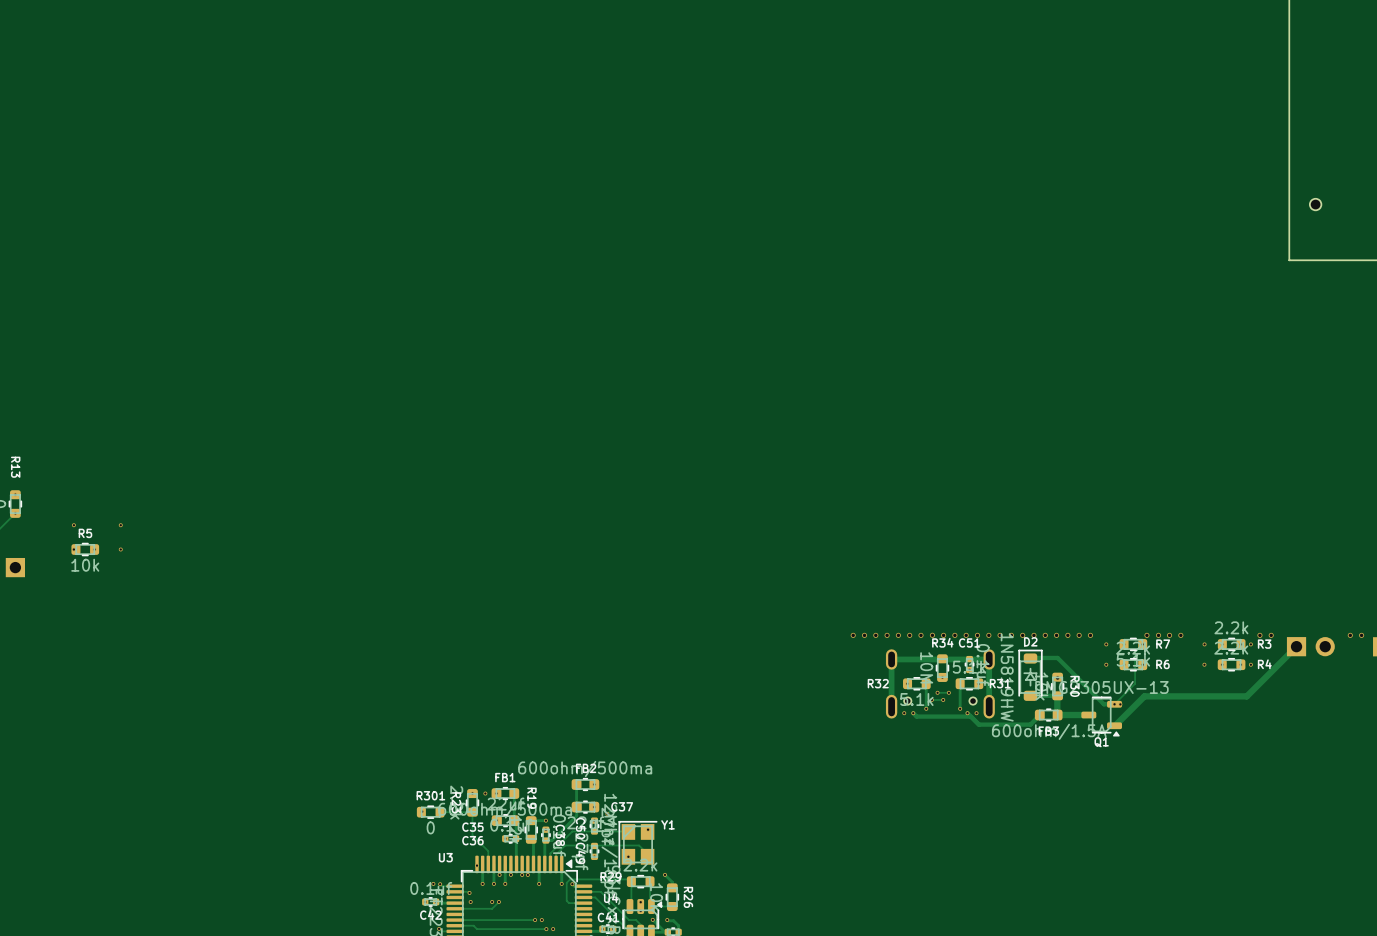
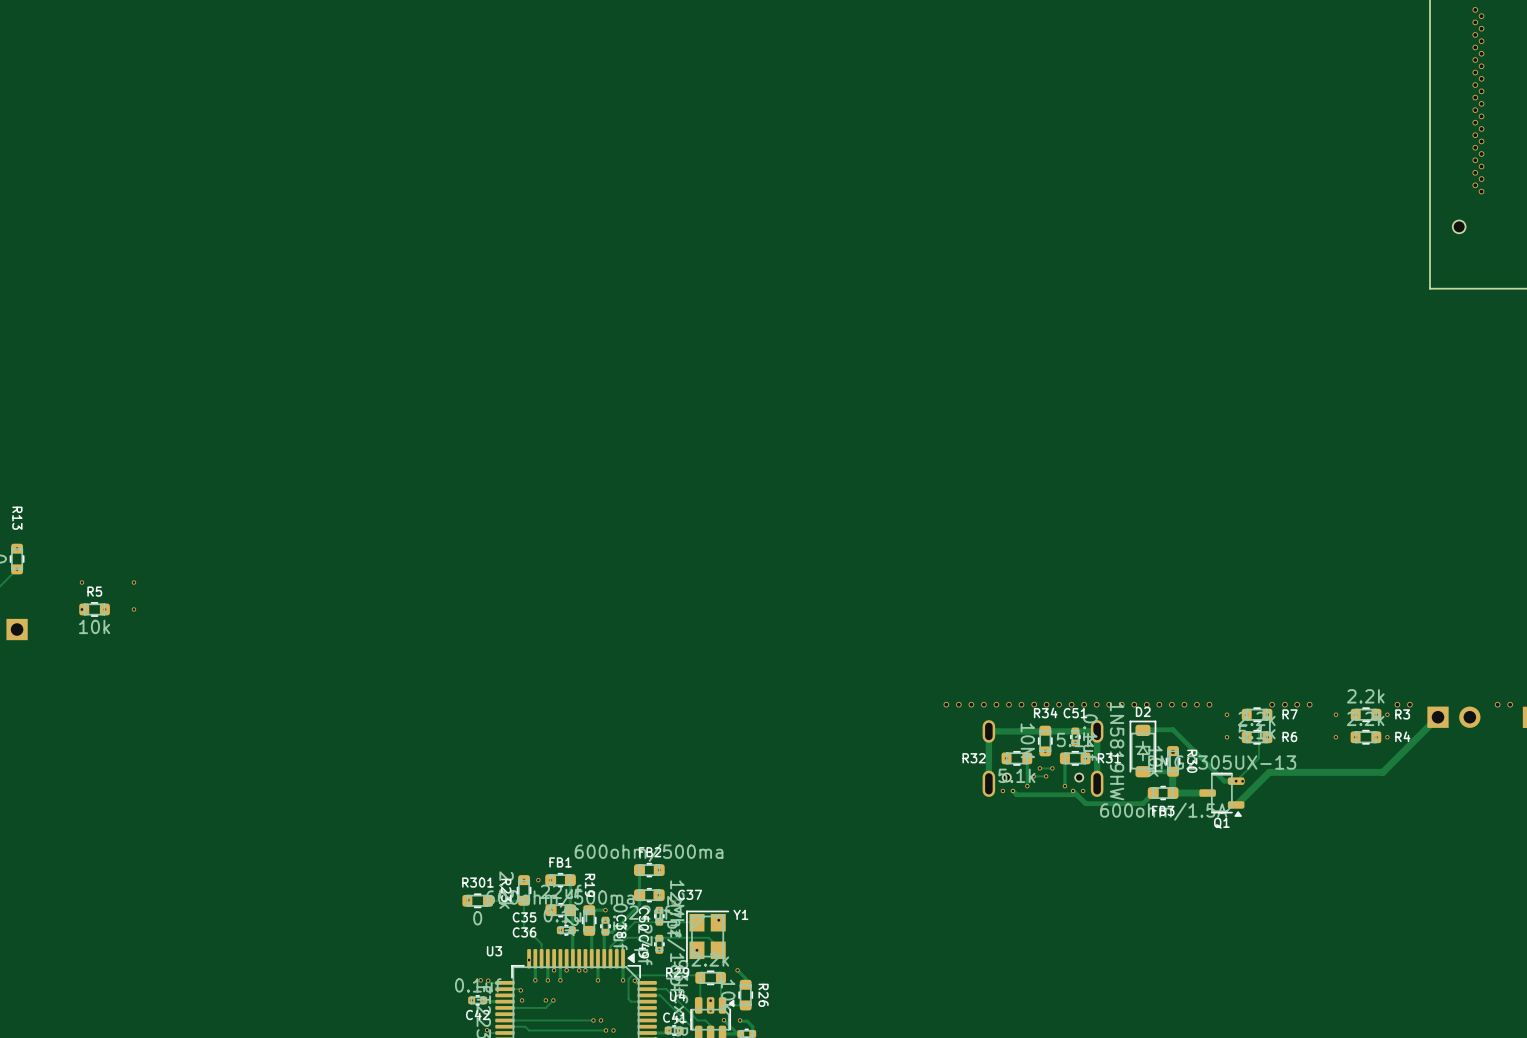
via: none -> (1475, 9)
via: none -> (1481, 16)
via: none -> (1475, 22)
via: none -> (1481, 28)
via: none -> (1475, 34)
via: none -> (1481, 41)
via: none -> (1475, 47)
via: none -> (1481, 53)
via: none -> (1475, 60)
via: none -> (1481, 66)
via: none -> (1475, 72)
via: none -> (1481, 78)
via: none -> (1475, 85)
via: none -> (1481, 91)
via: none -> (1475, 97)
via: none -> (1481, 103)
via: none -> (1475, 110)
via: none -> (1481, 116)
via: none -> (1475, 122)
via: none -> (1481, 128)
via: none -> (1475, 135)
via: none -> (1481, 141)
via: none -> (1475, 147)
via: none -> (1481, 153)
via: none -> (1475, 160)
via: none -> (1481, 166)
via: none -> (1475, 172)
via: none -> (1481, 179)
via: none -> (1475, 185)
via: none -> (1481, 191)

